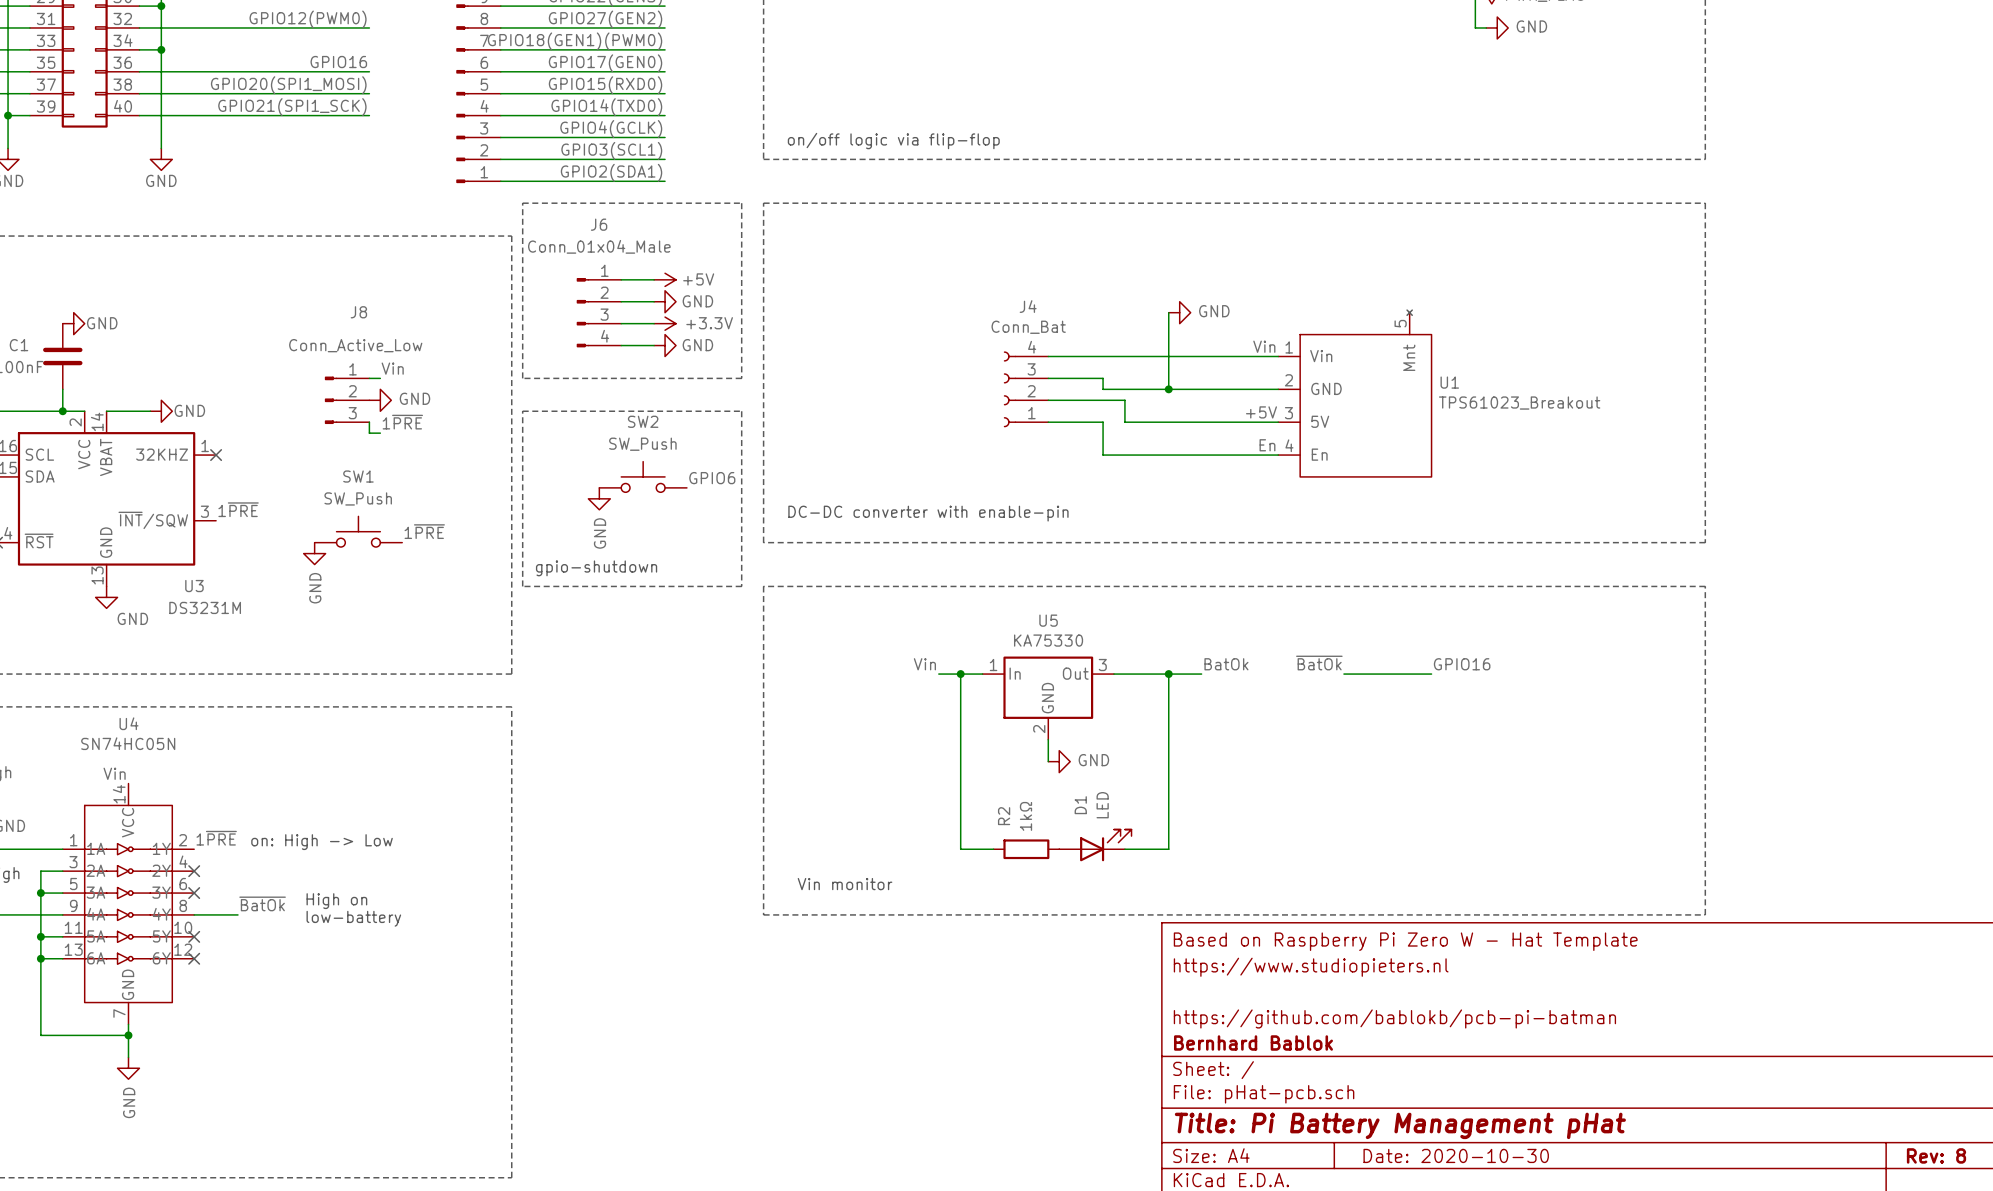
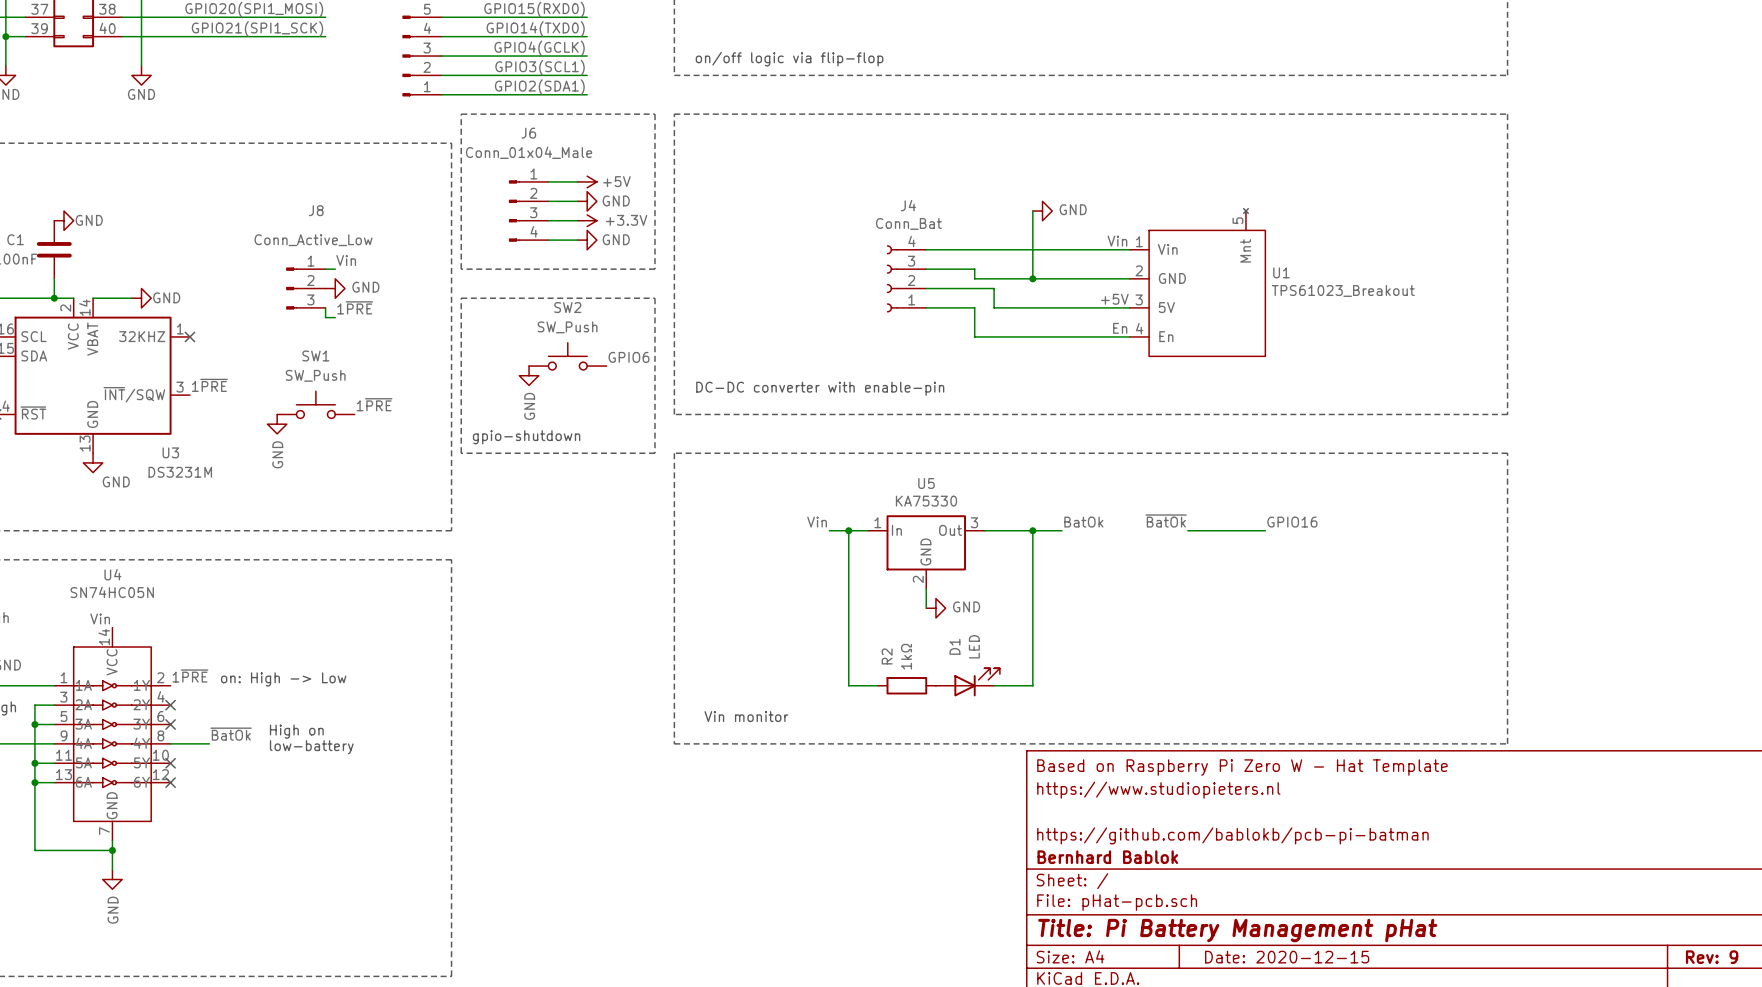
title block: Date: 2020-10-30 (1456, 1155) -> Date: 2020-12-15 (1287, 957)
title block: Rev: 8 (1936, 1155) -> Rev: 9 (1712, 957)

